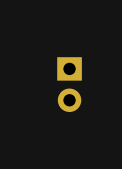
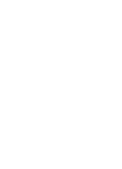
part: (69, 84) -> none

